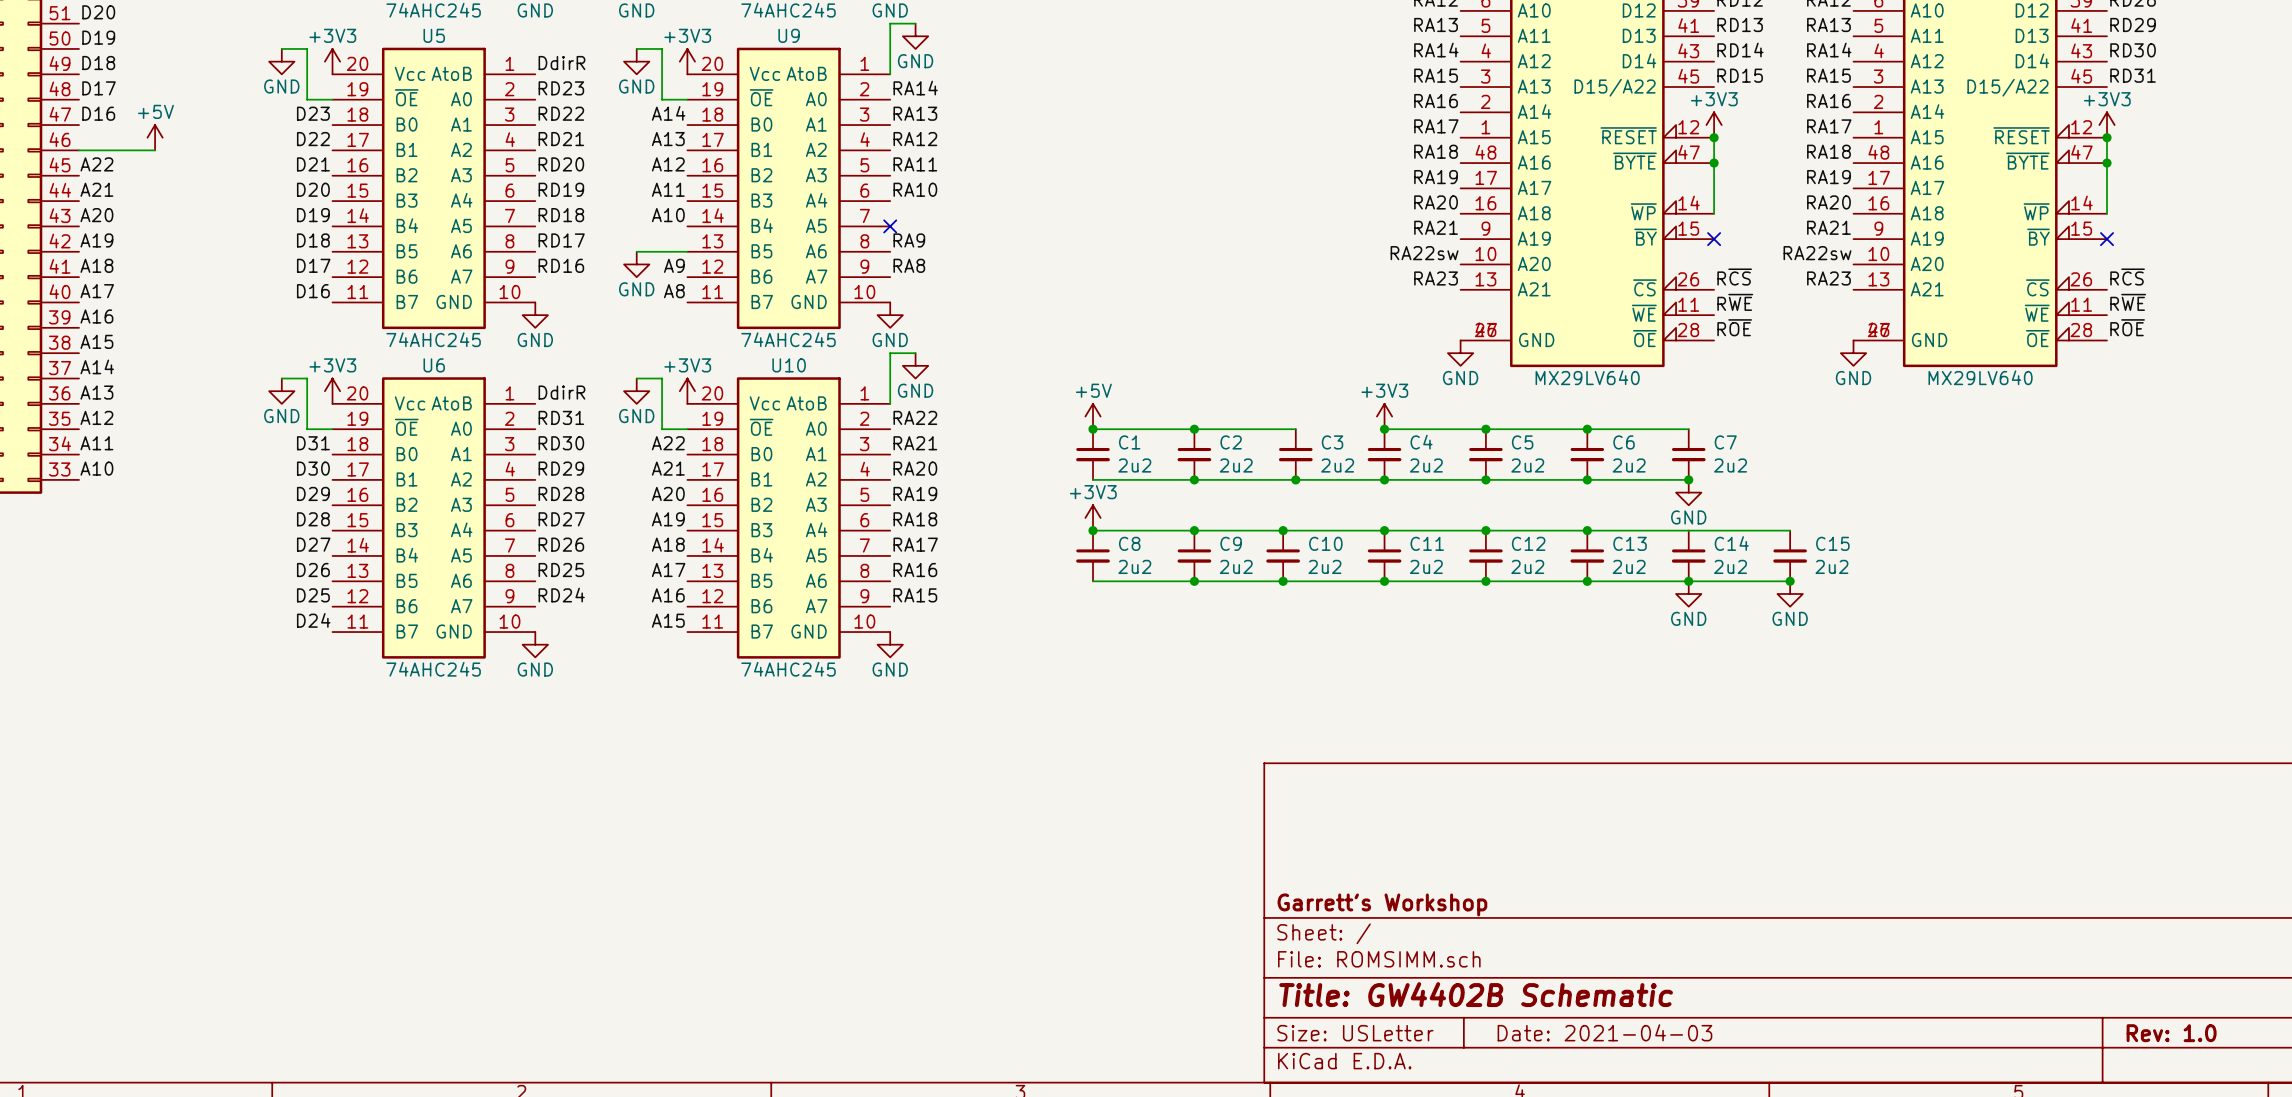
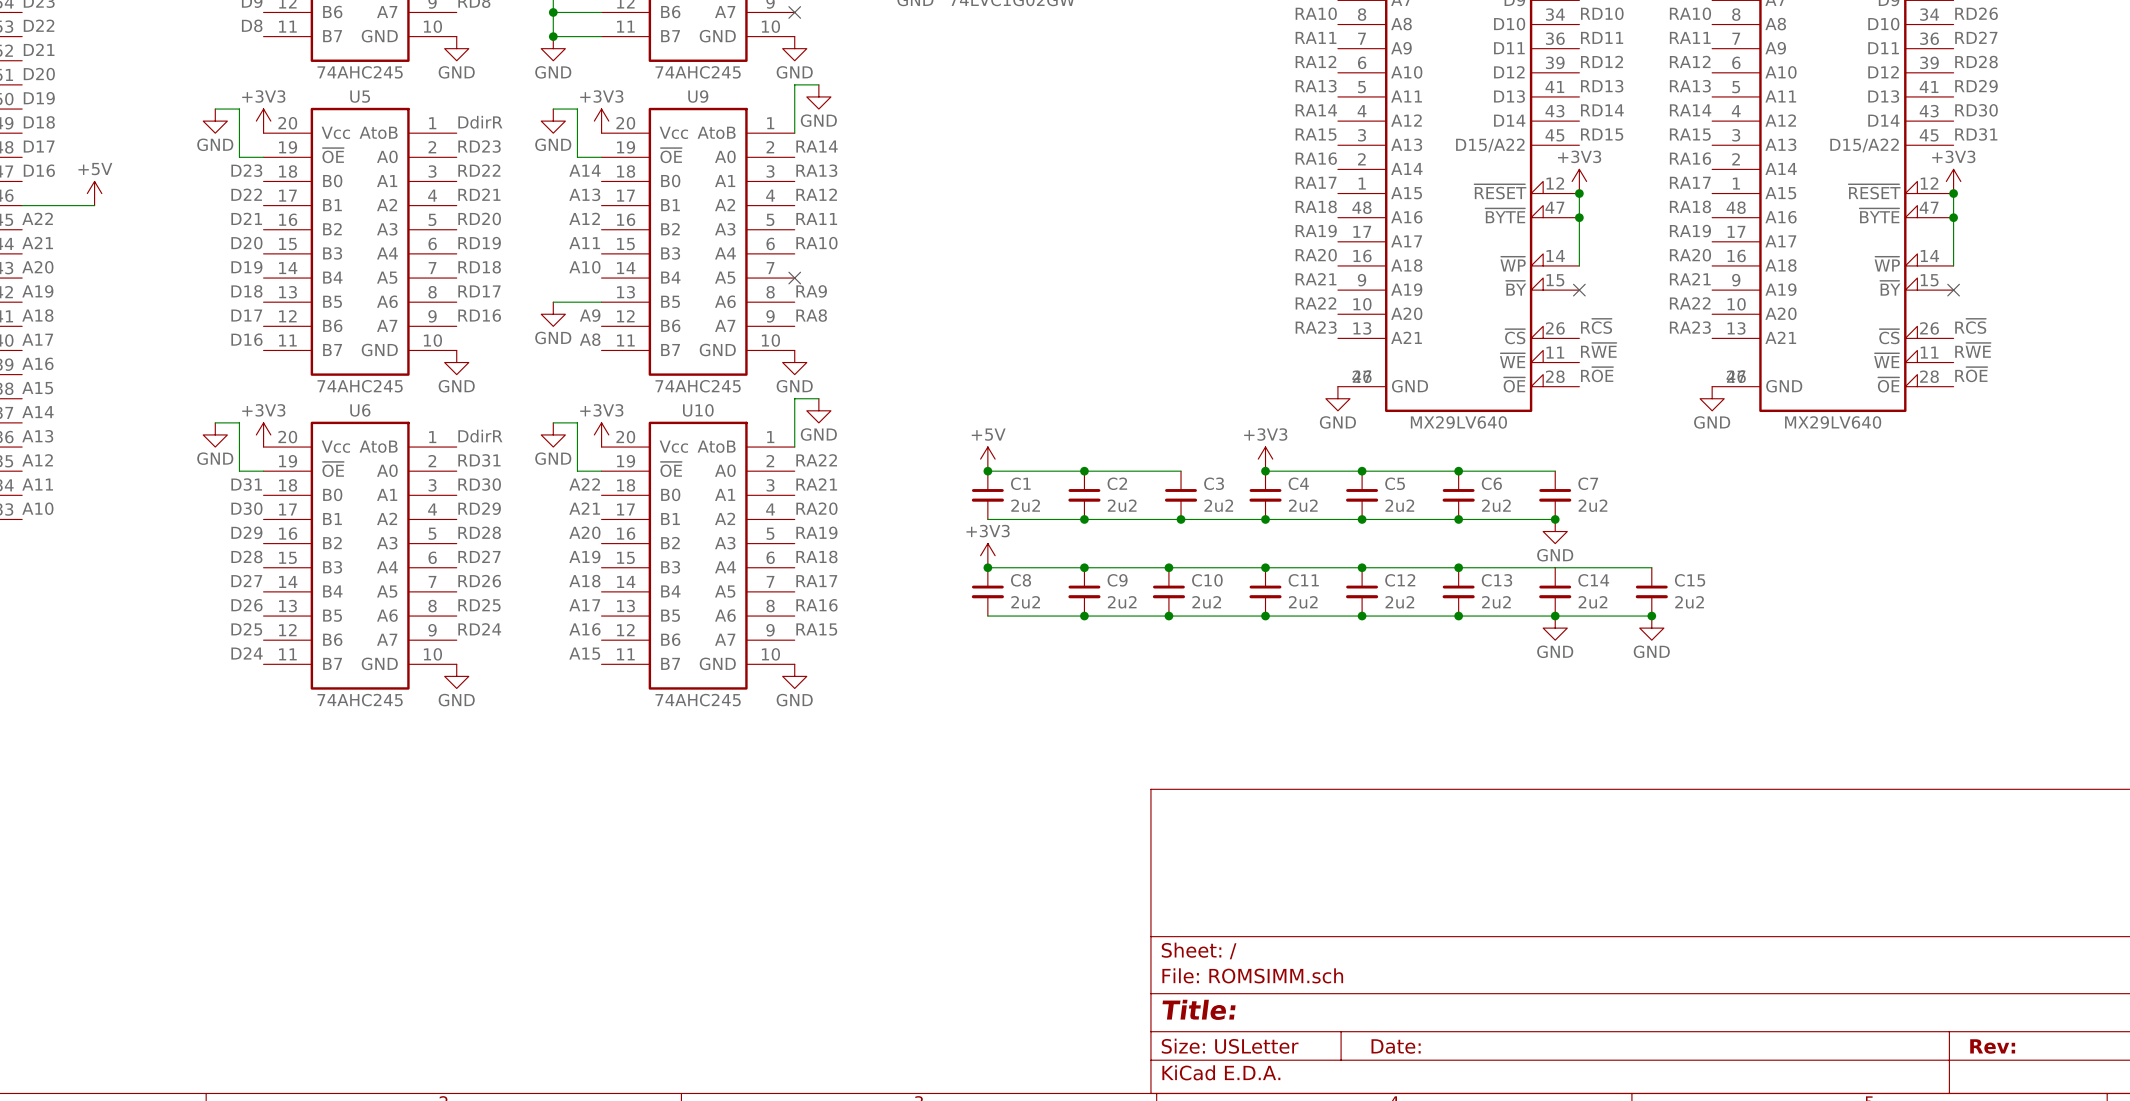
label: RA22sw (1424, 253) -> RA22 (1315, 303)
label: RA22sw (1817, 253) -> RA22 (1690, 303)
title block: Garrett's Workshop (1382, 904) -> none
title block: Title: GW4402B Schematic (1476, 994) -> Title: (1199, 1009)
title block: Date: 2021-04-03 (1604, 1032) -> Date: (1396, 1046)
title block: Rev: 1.0 (2171, 1033) -> Rev: (1992, 1046)

